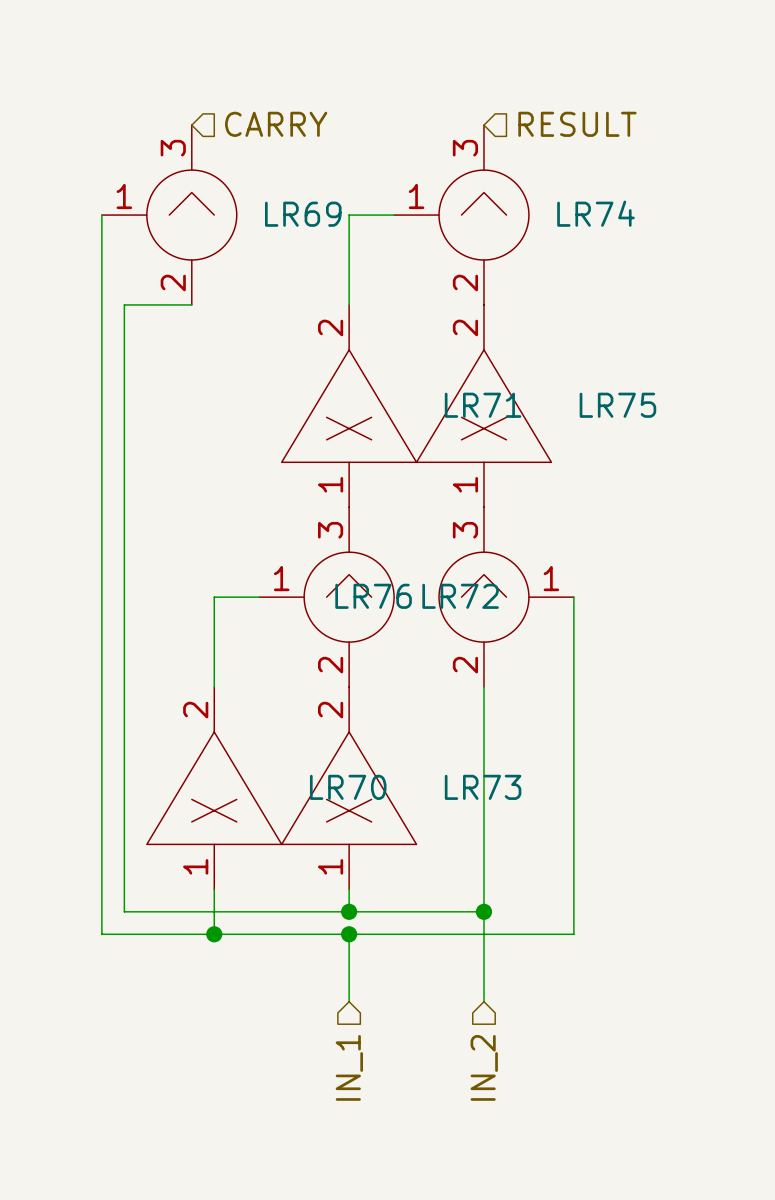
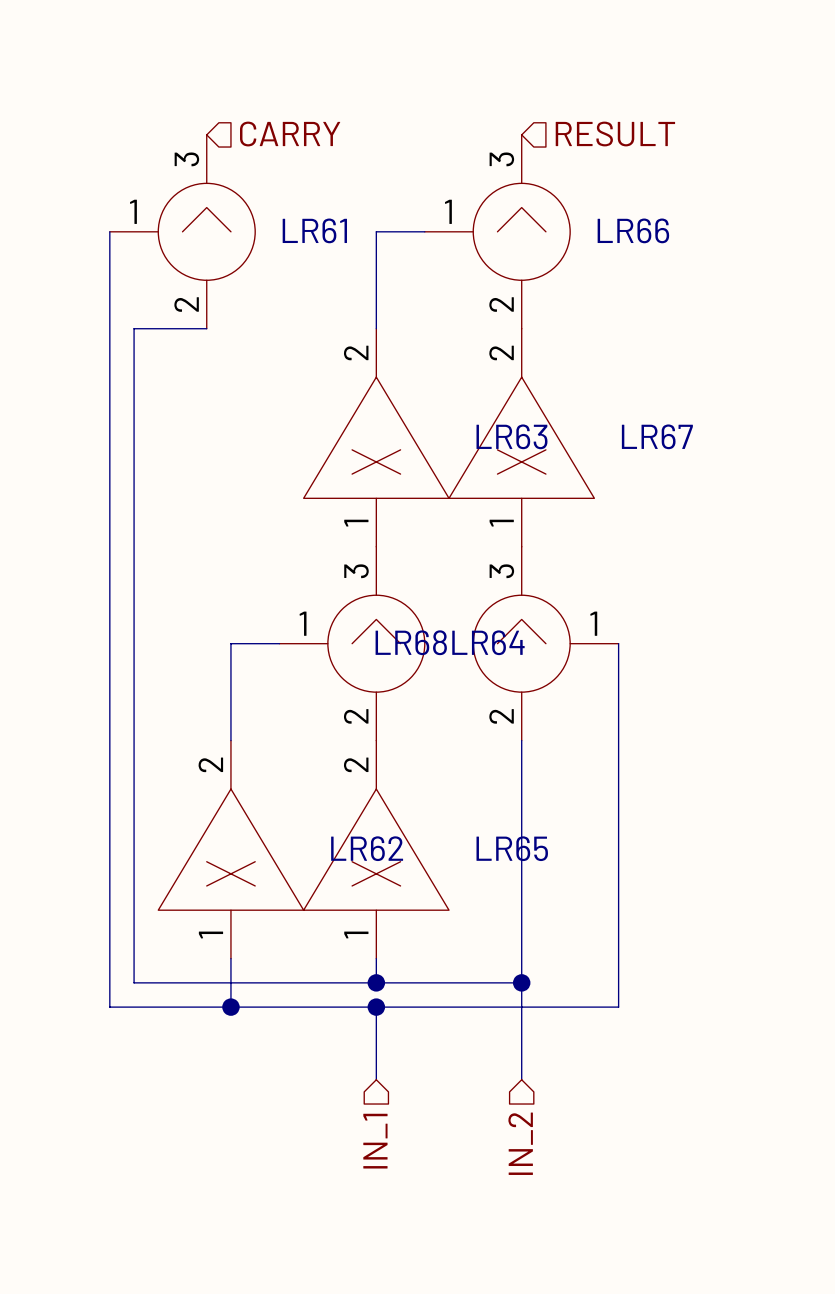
LR74 name: LR74 (596, 213) -> LR66 (633, 230)
LR69 name: LR69 (303, 214) -> LR61 (314, 230)
LR71 name: LR71 (483, 405) -> LR63 (511, 436)
LR75 name: LR75 (617, 405) -> LR67 (657, 436)
LR76 name: LR76 (373, 596) -> LR68 (411, 642)
LR72 name: LR72 (460, 596) -> LR64 (488, 642)
LR70 name: LR70 (348, 787) -> LR62 (367, 848)
LR73 name: LR73 (483, 787) -> LR65 (512, 848)

